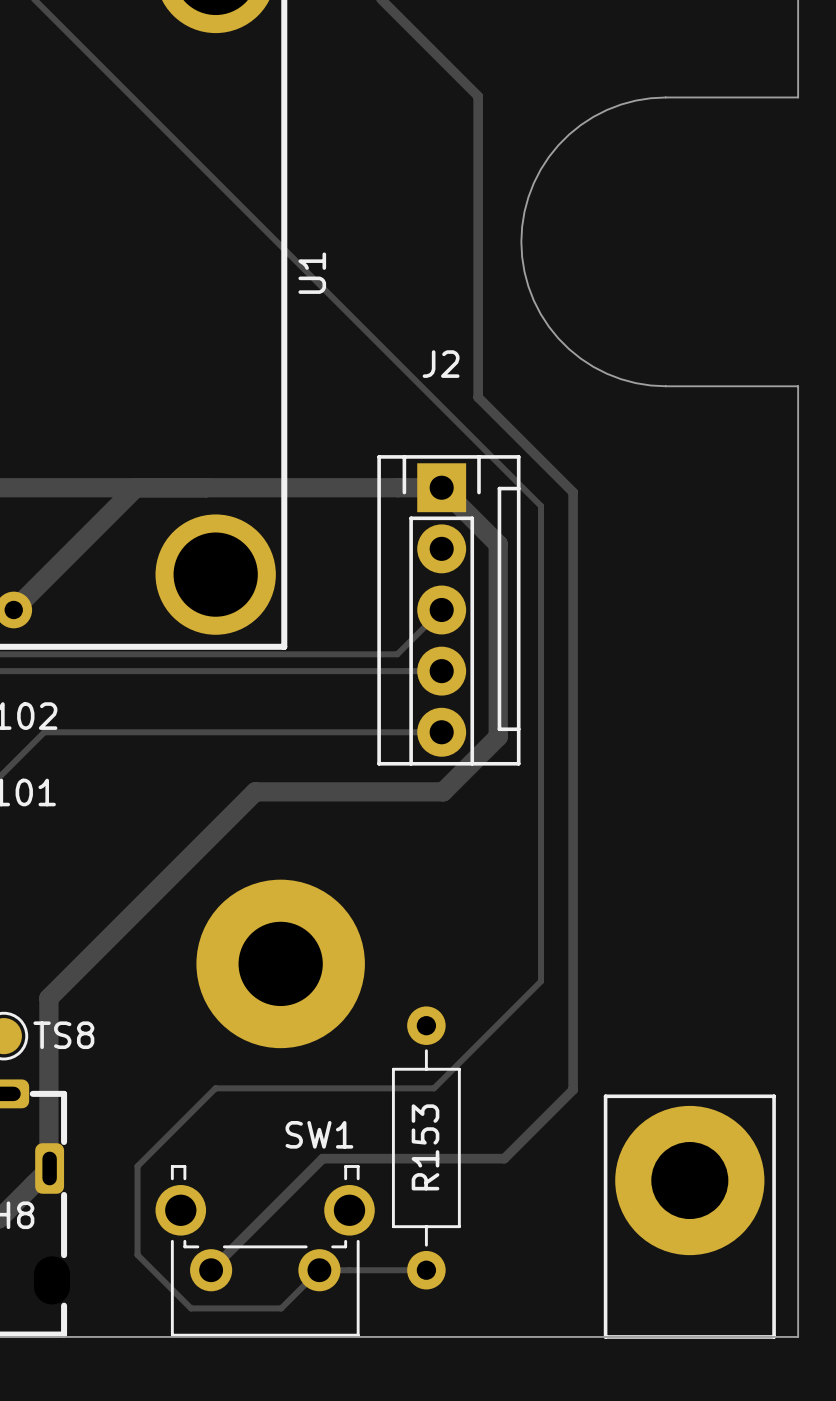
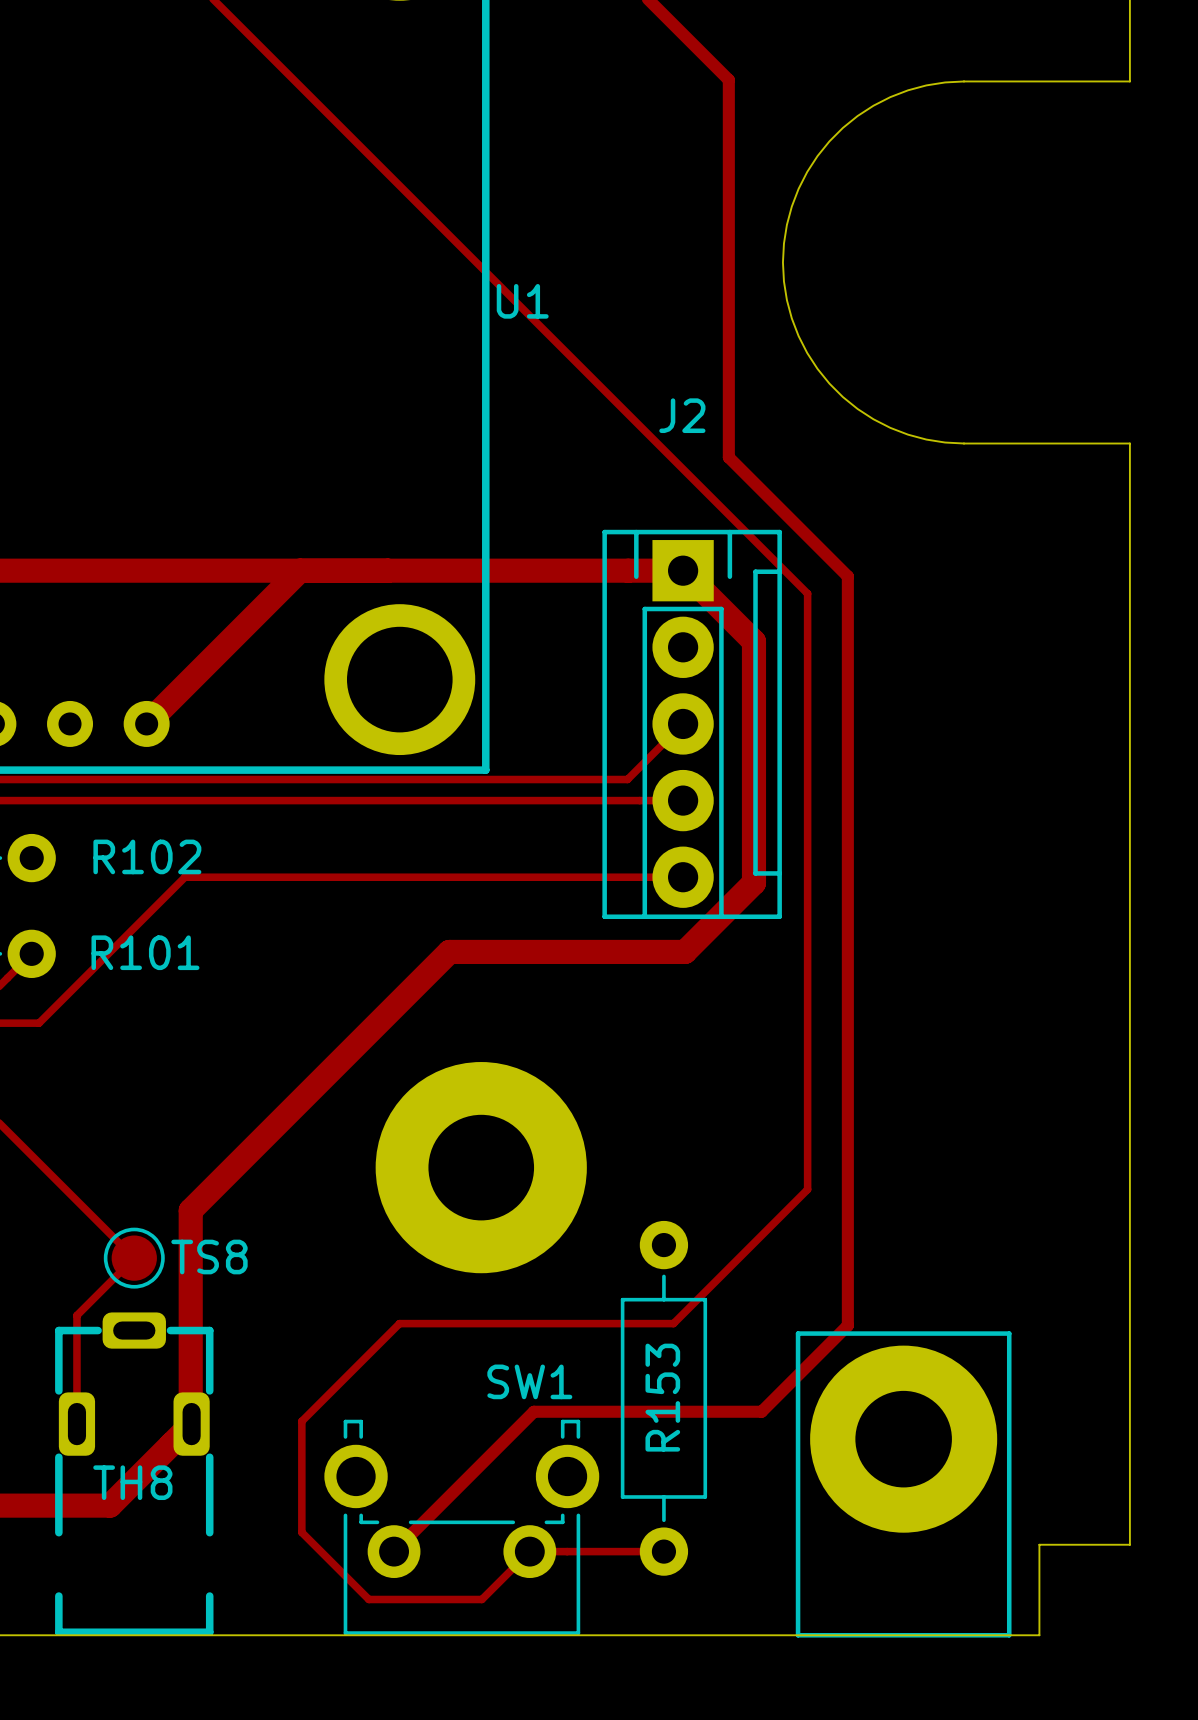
U1 name rotation: 0° (312, 273) -> 90° clockwise (522, 301)
part position: (689, 1216) -> (903, 1484)
board edge: (798, 1264) (798, 1336) (725, 1336) -> (1129, 1544) (1039, 1544) (1039, 1635)

